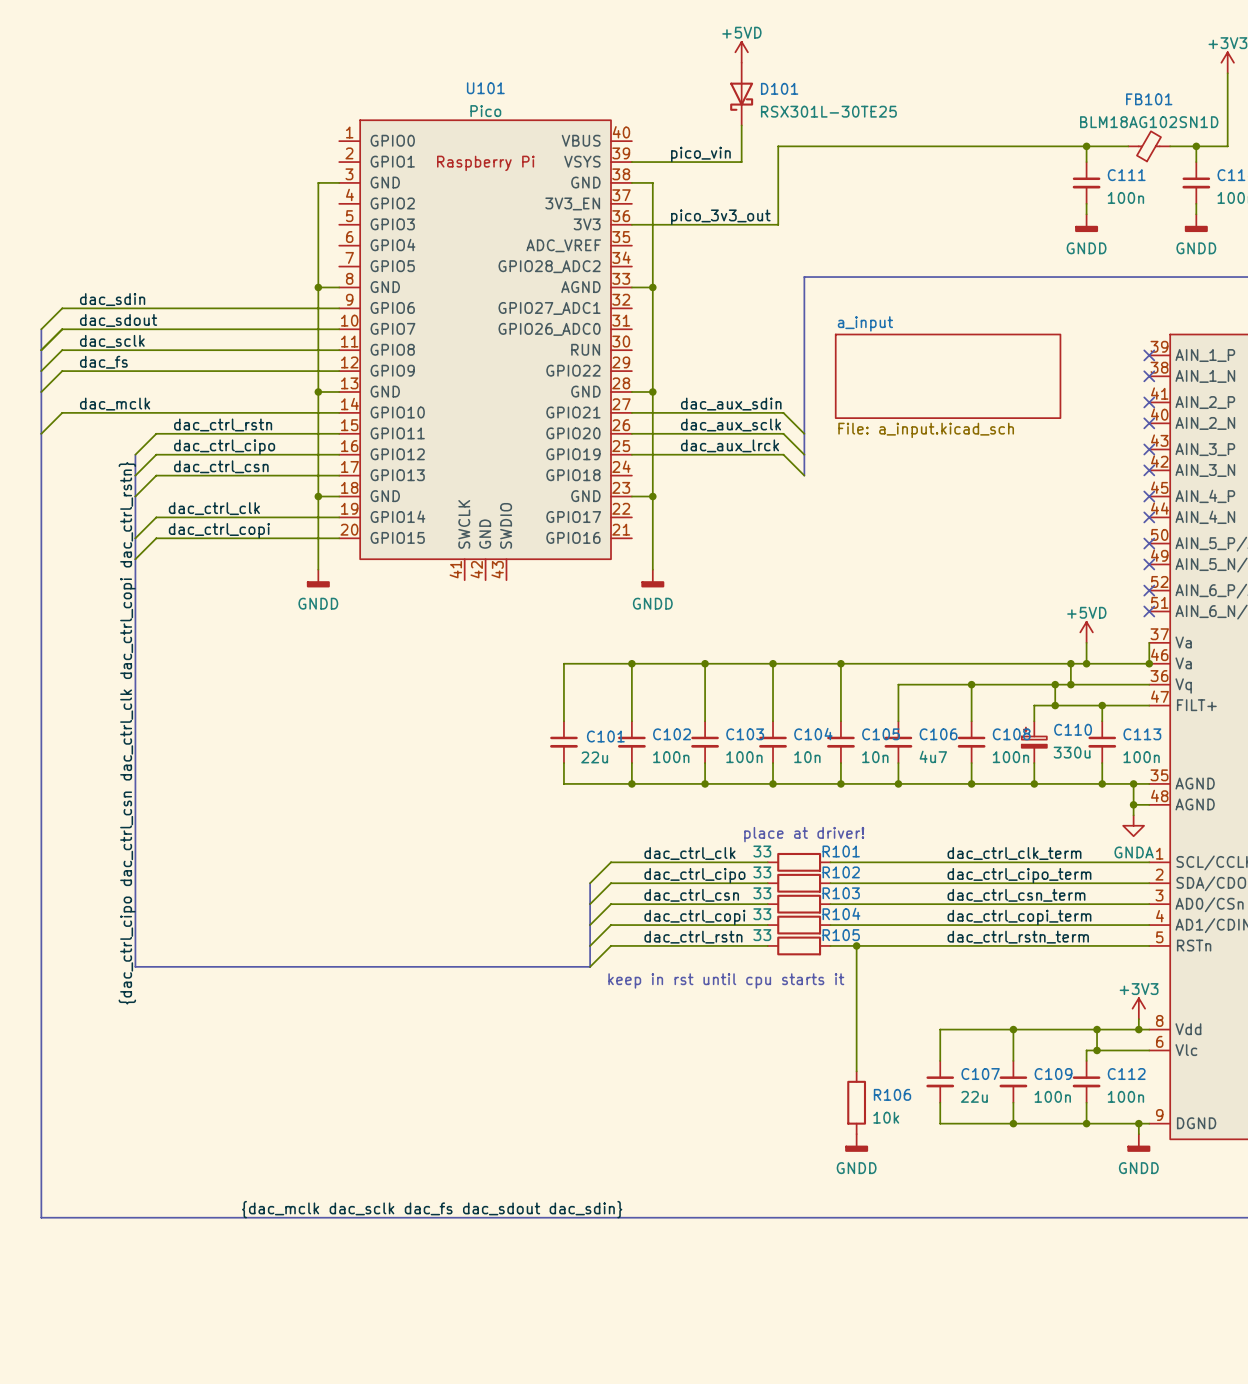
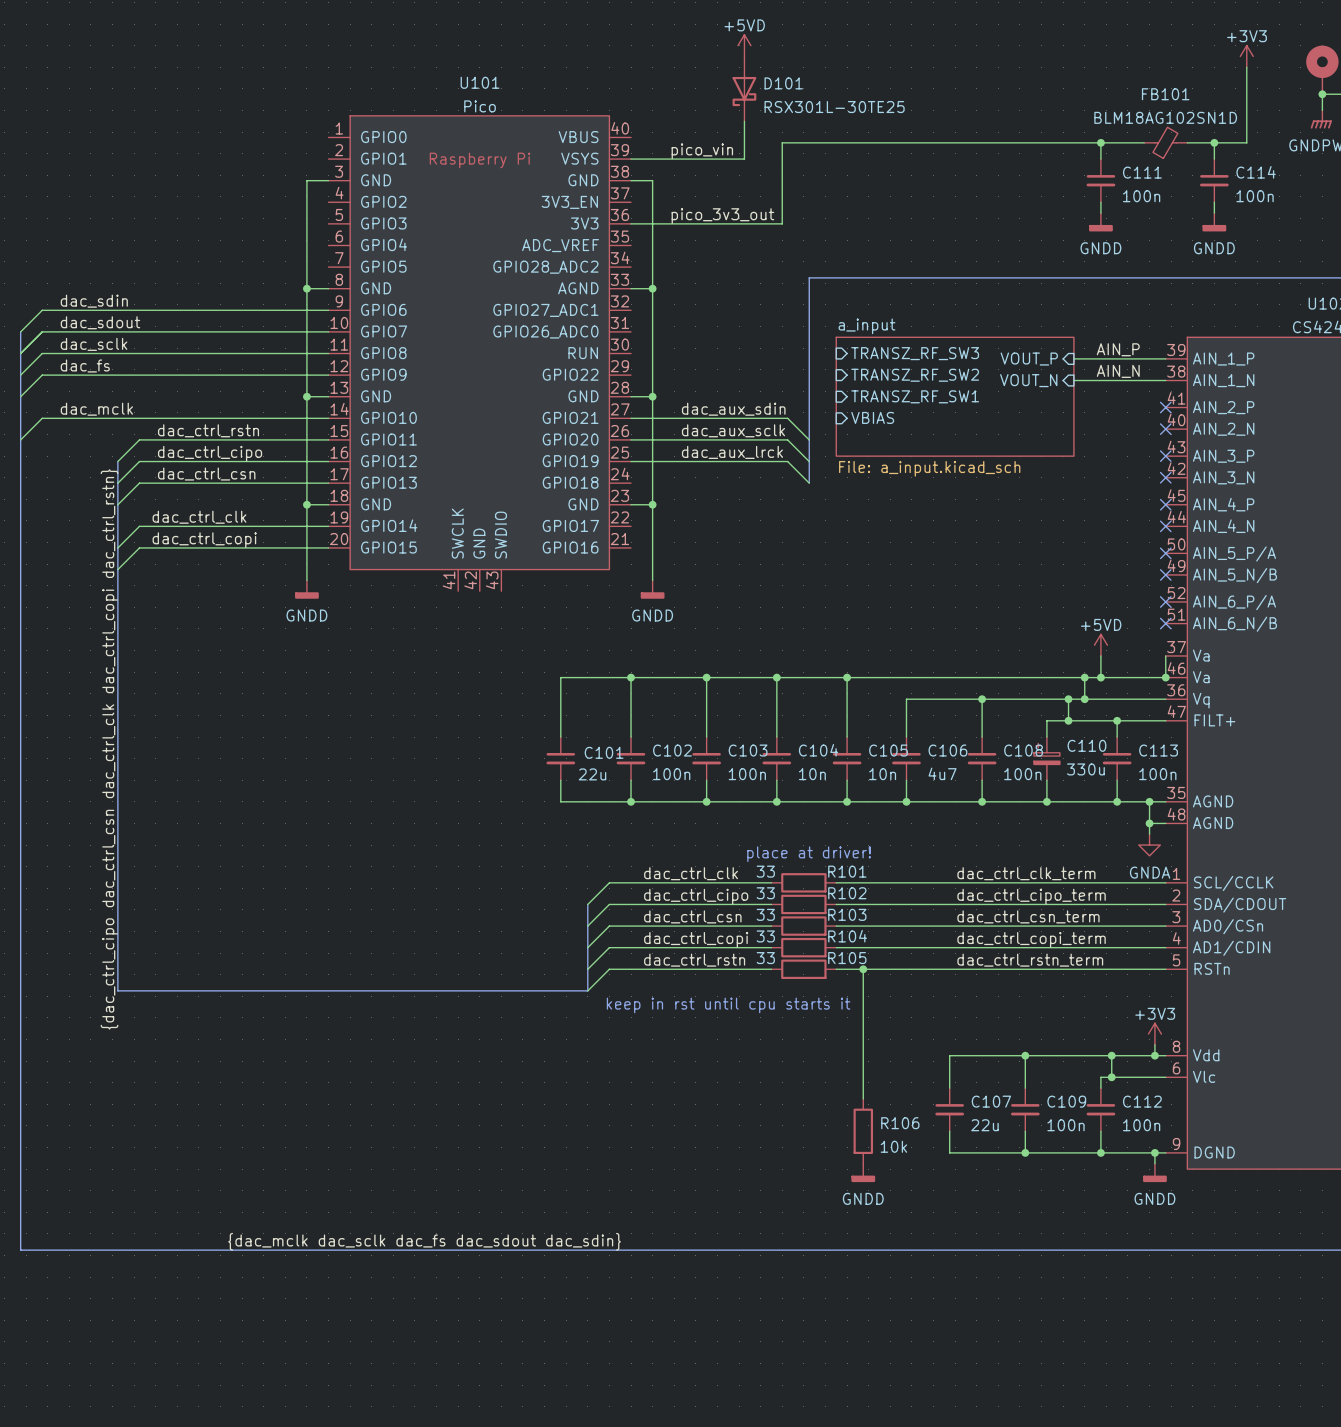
label: none -> AIN_P (1118, 349)
sheet pin: none -> TRANSZ_RF_SW3 (915, 353)
sheet pin: none -> VOUT_P (1029, 359)
wire: none -> (1073, 358) (1165, 358)
no-connect mark: (1149, 355) -> none
label: none -> AIN_N (1118, 371)
sheet pin: none -> TRANSZ_RF_SW2 (915, 375)
sheet a_input: File: a_input.kicad_sch (948, 376) -> none
sheet pin: none -> VOUT_N (1028, 380)
wire: none -> (1073, 380) (1165, 380)
no-connect mark: (1149, 376) -> none
sheet a_input: none -> File: a_input.kicad_sch (955, 396)
sheet pin: none -> TRANSZ_RF_SW1 (915, 396)
sheet pin: none -> VBIAS (872, 417)

